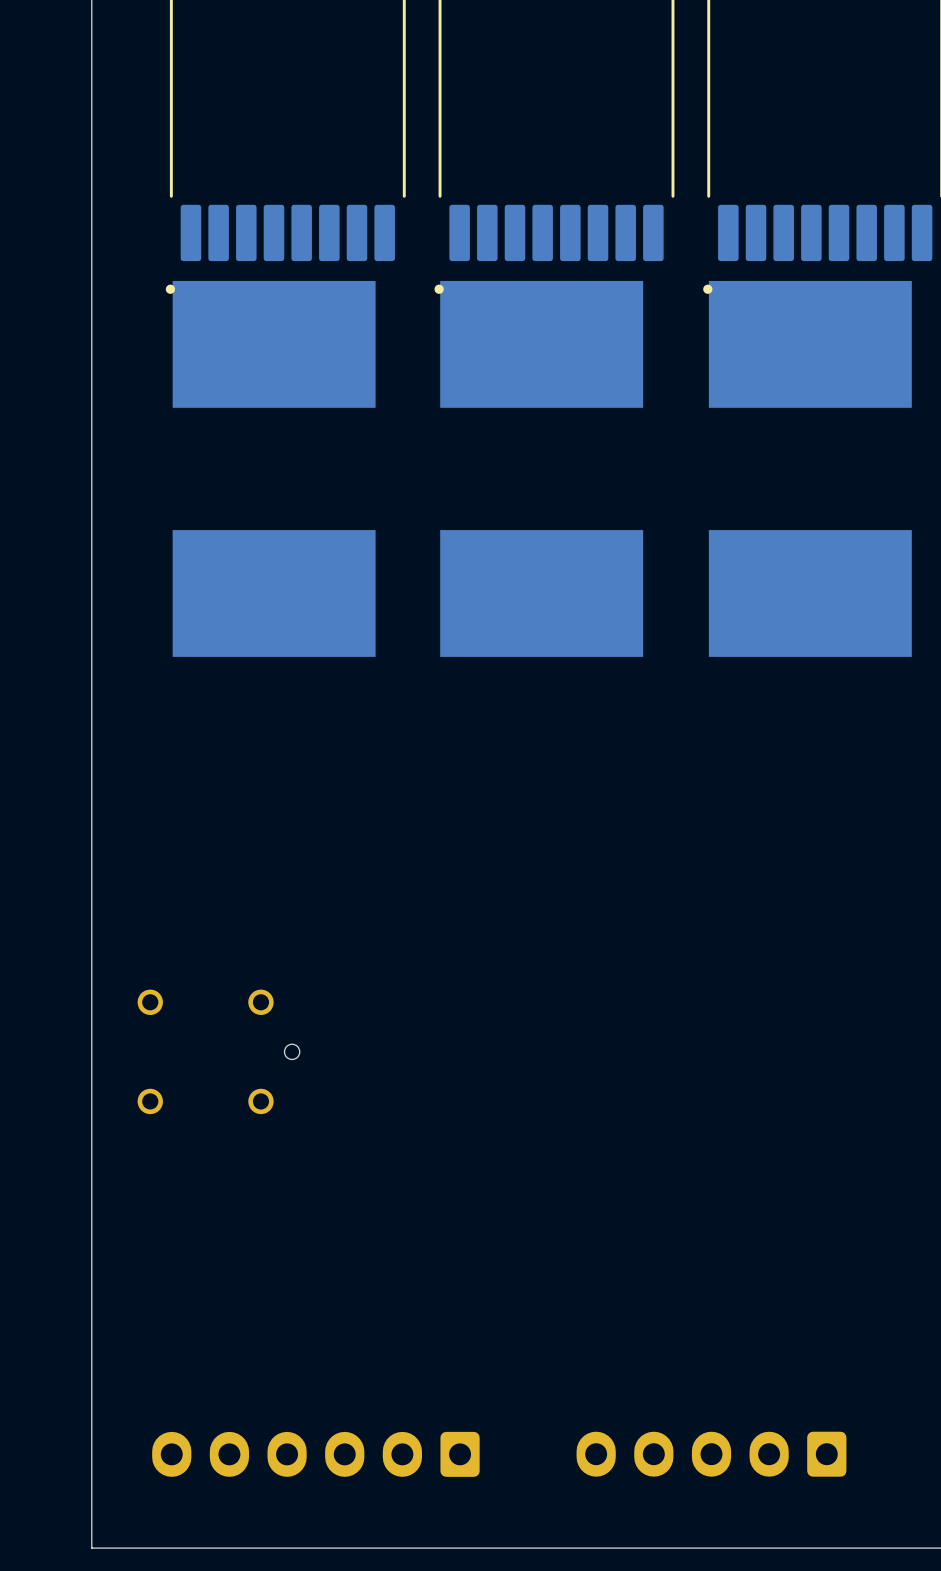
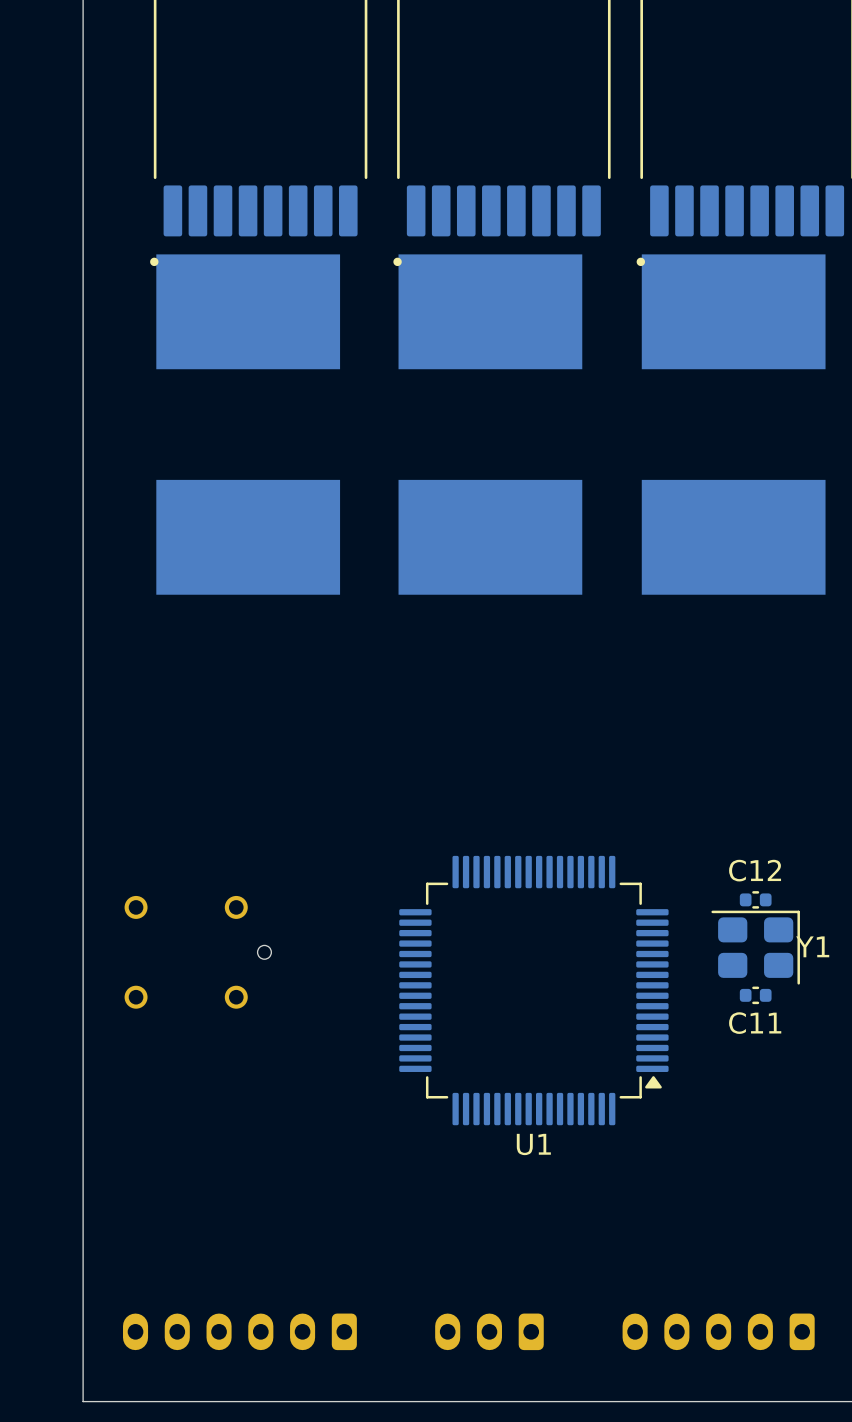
C12: none -> (755, 899)
Y1: none -> (755, 947)
U1: none -> (533, 990)
C11: none -> (755, 995)
part: (315, 1454) -> none
part: (711, 1454) -> none
part: none -> (239, 1331)
part: none -> (489, 1331)
part: none -> (718, 1331)

